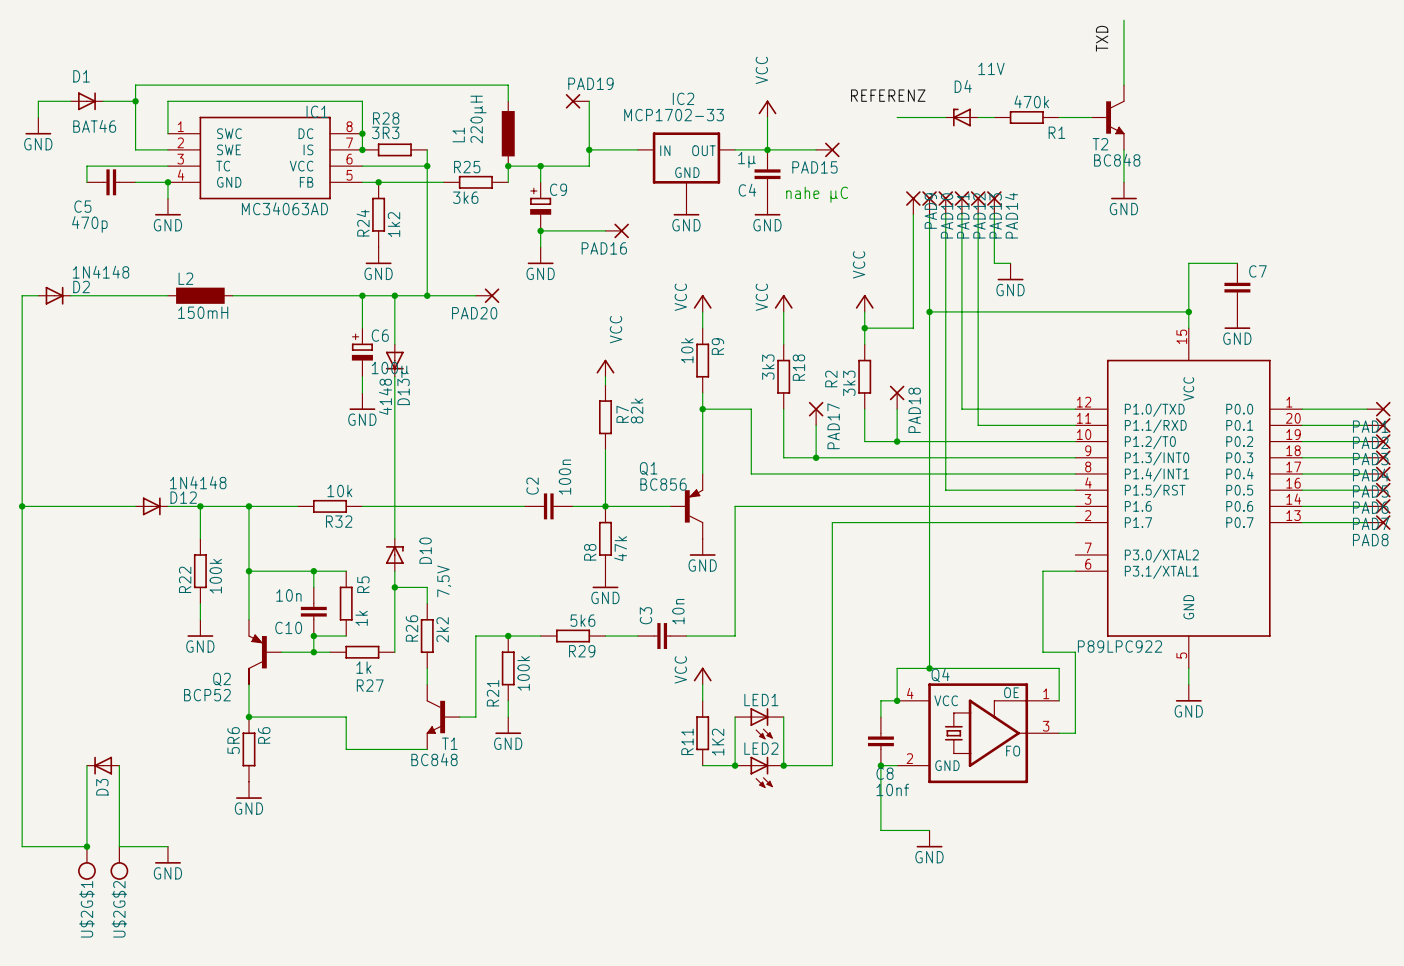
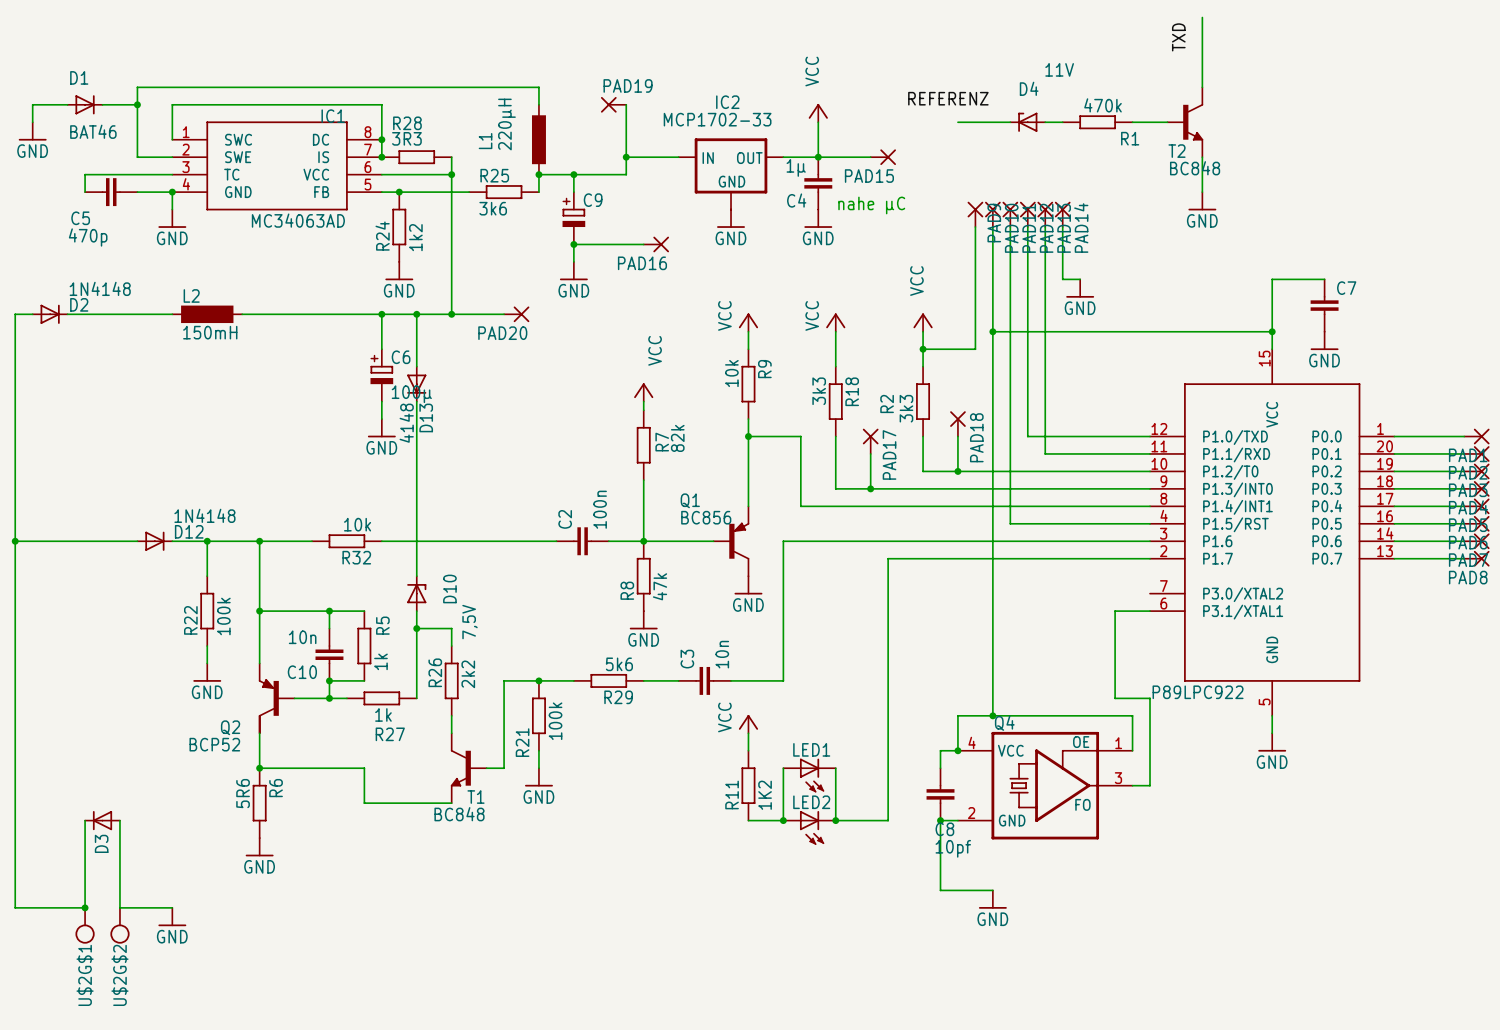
C8 value: 10nf (892, 789) -> 10pf (953, 848)

